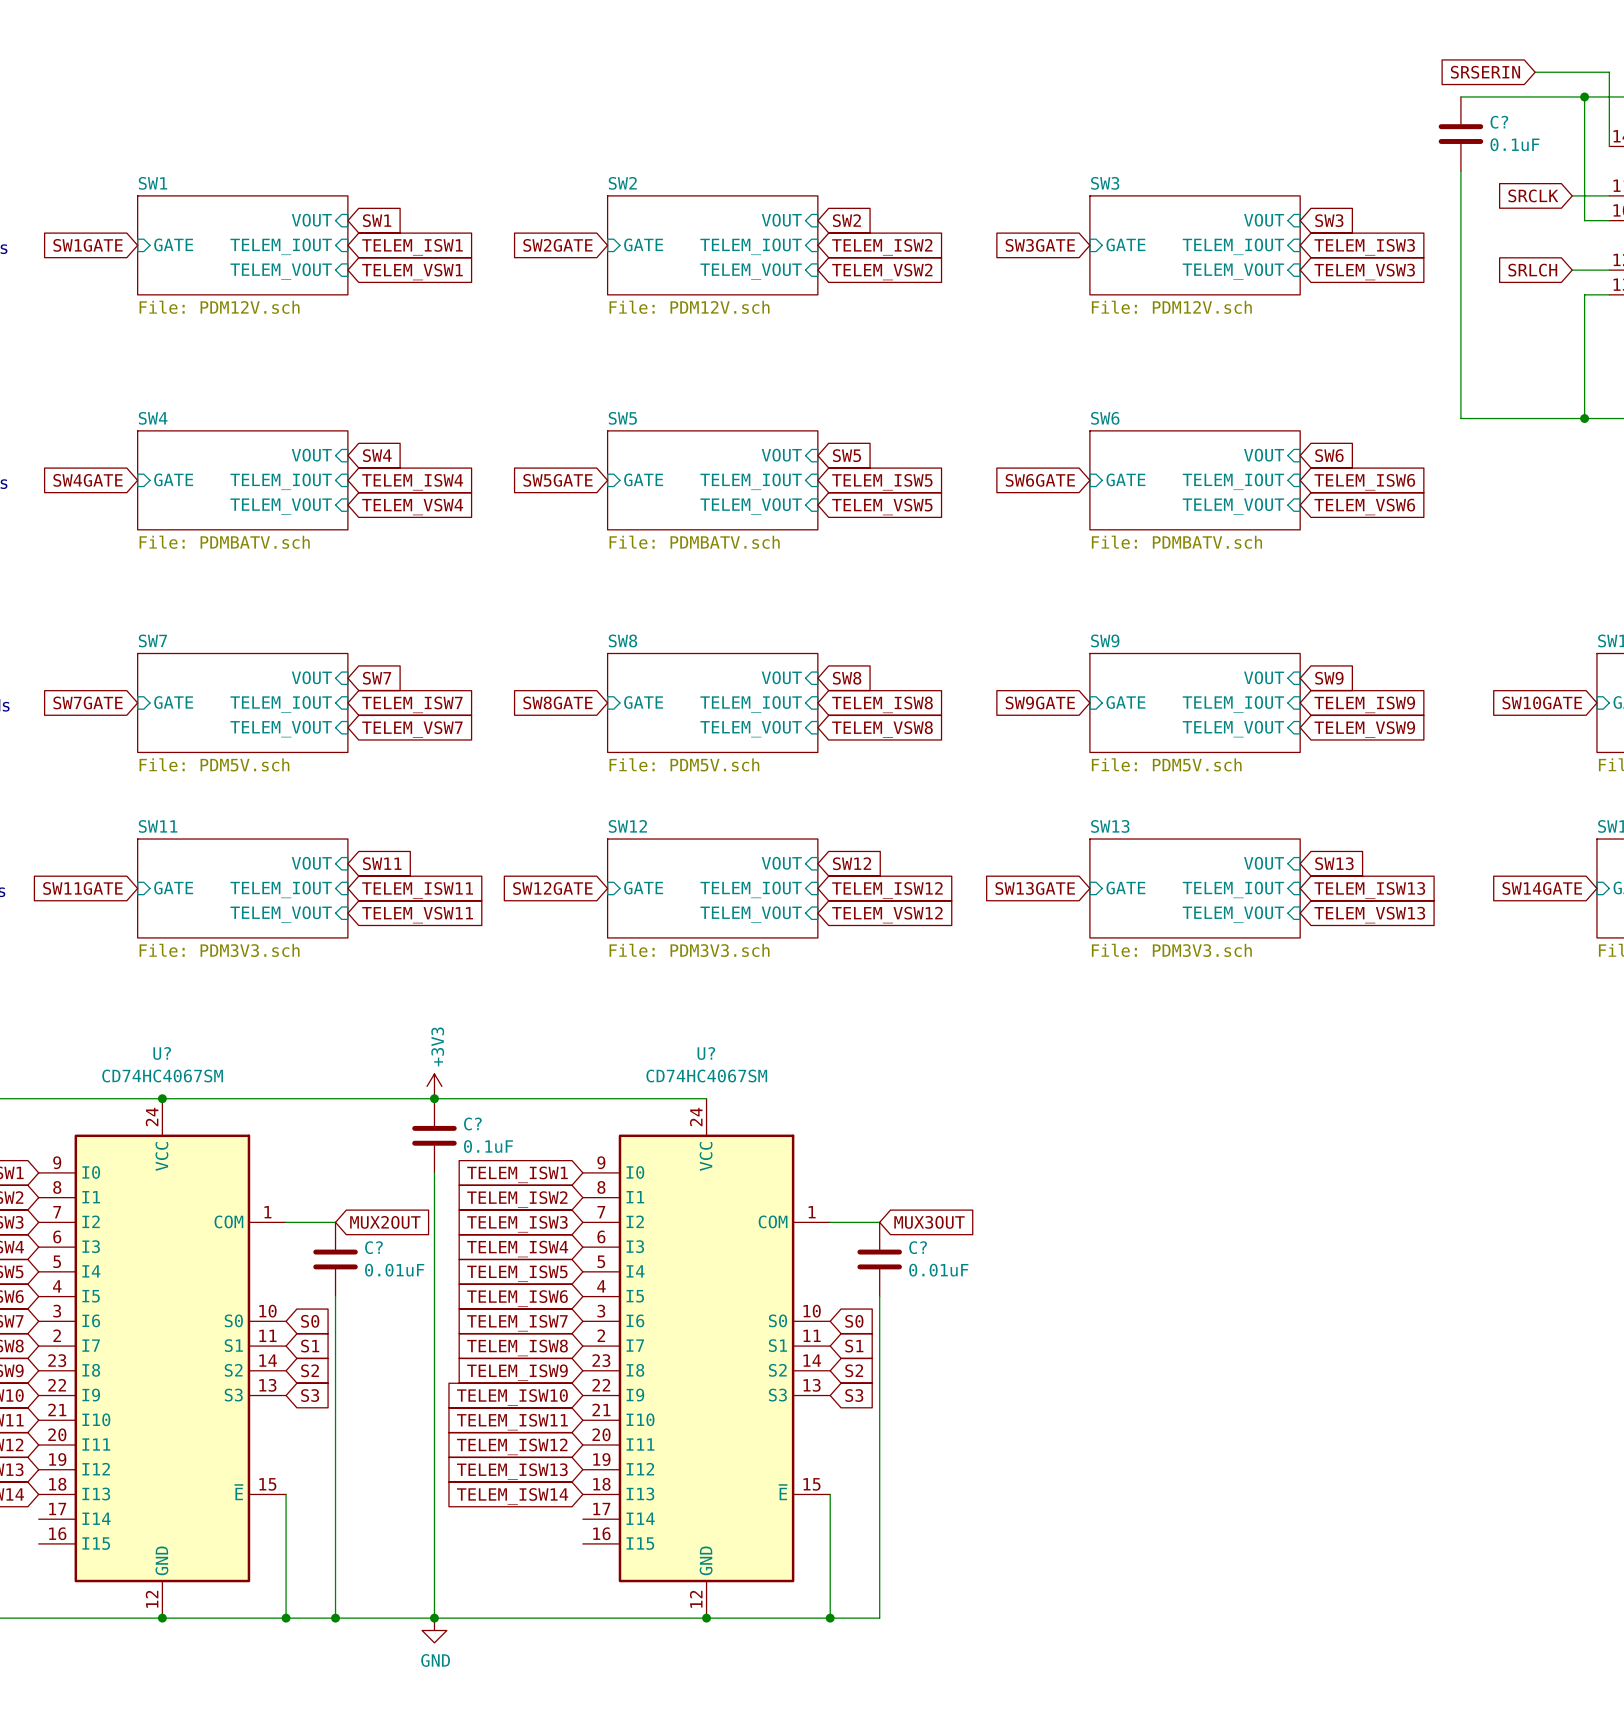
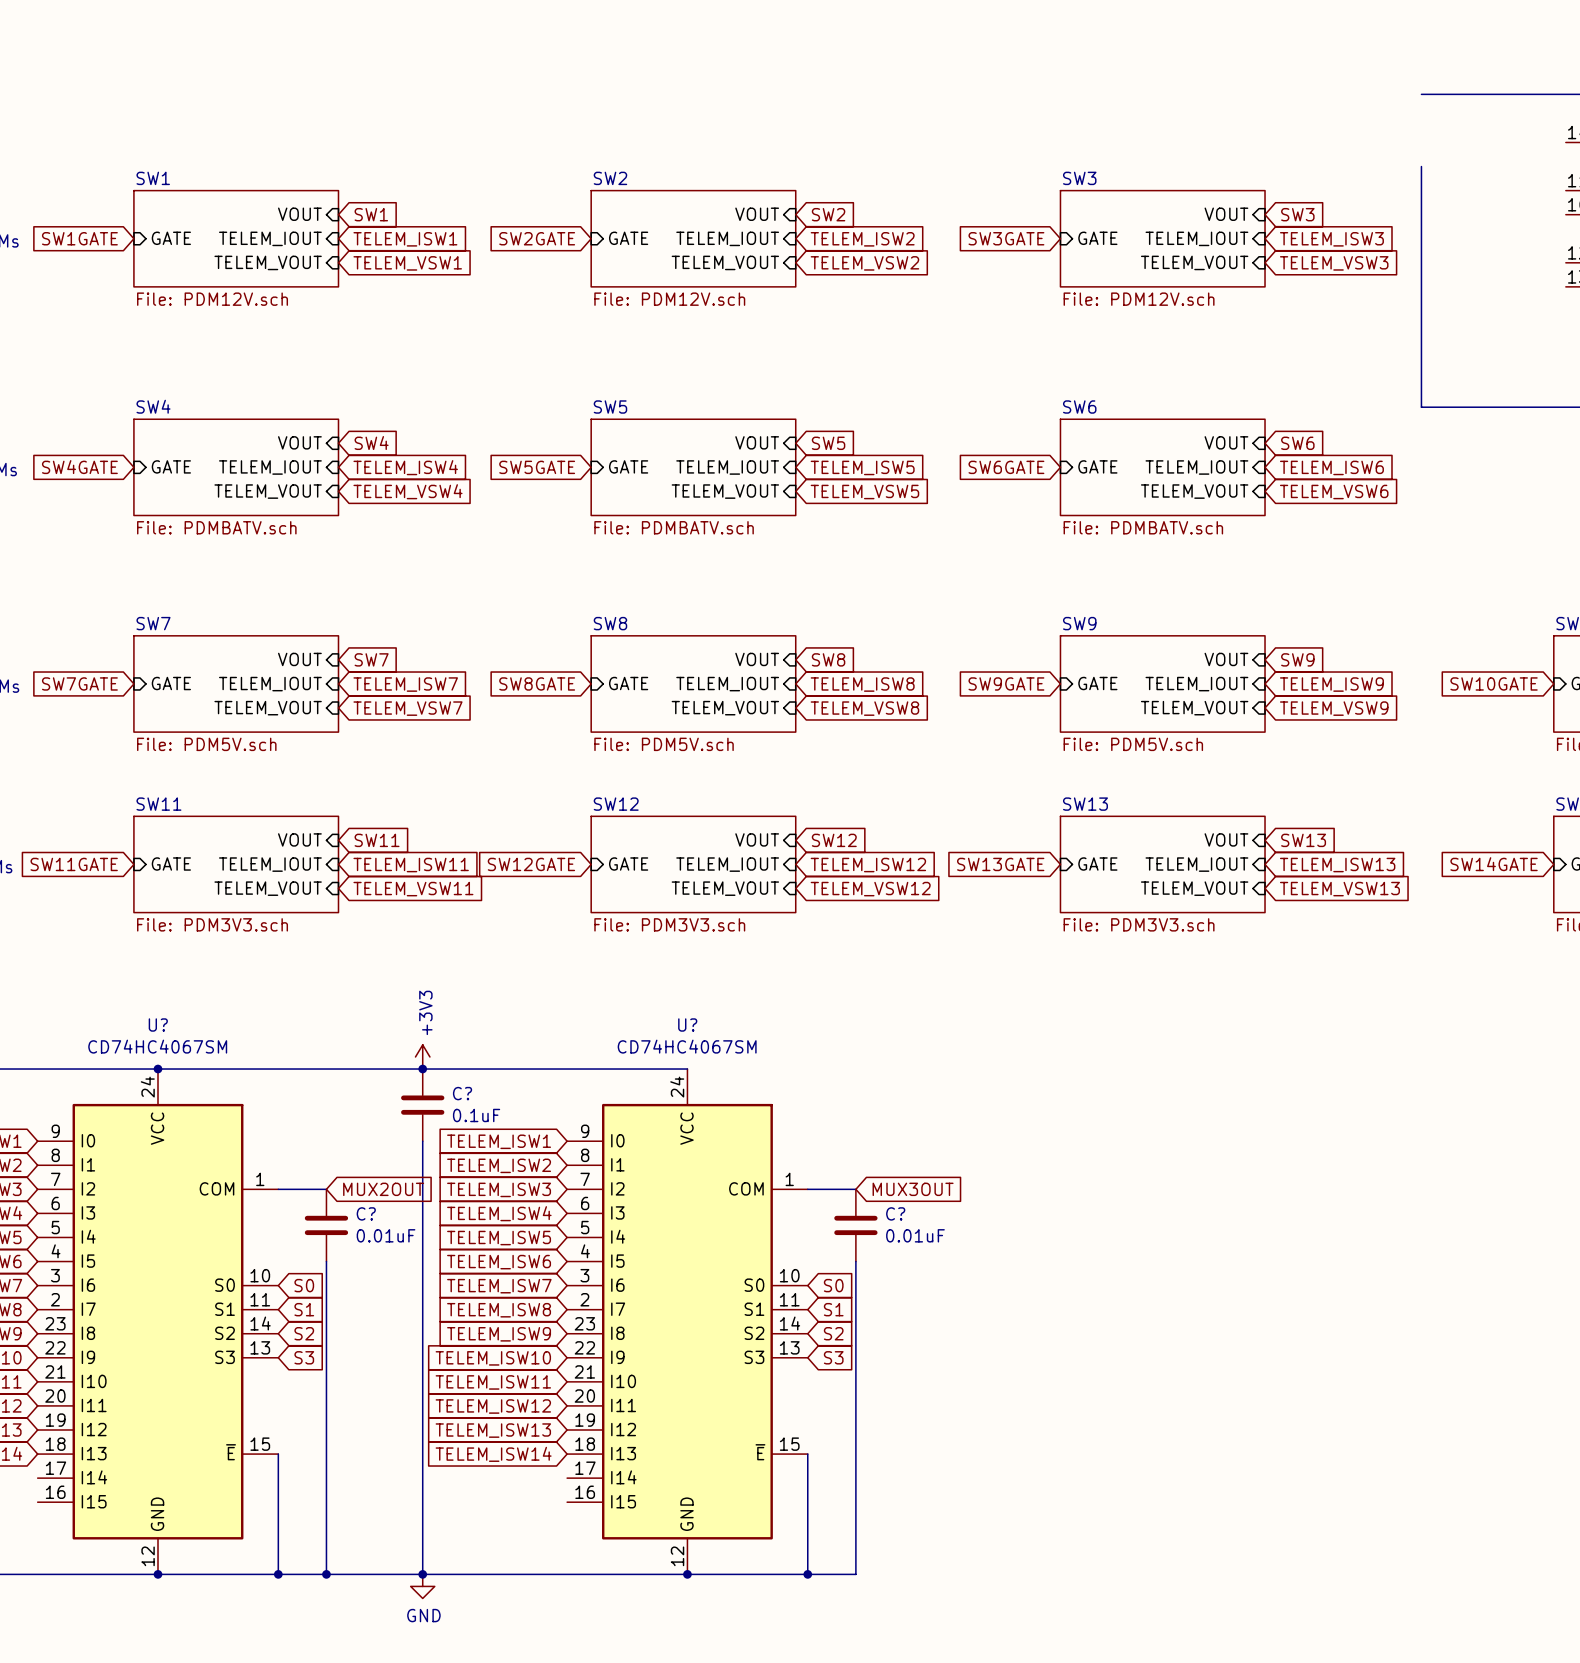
global label: SRSERIN (1485, 72) -> none
wire: (1535, 72) (1609, 72) (1609, 146) -> none
wire: (1584, 96) (1584, 220) (1609, 220) -> none
junction: (1584, 96) -> none
C?: 0.1uF (1460, 134) -> none
global label: SRCLK (1533, 195) -> none
wire: (1572, 195) (1609, 195) -> none
global label: SRLCH (1532, 270) -> none
wire: (1572, 270) (1609, 270) -> none
wire: (1609, 294) (1584, 294) (1584, 418) -> none
junction: (1584, 418) -> none

